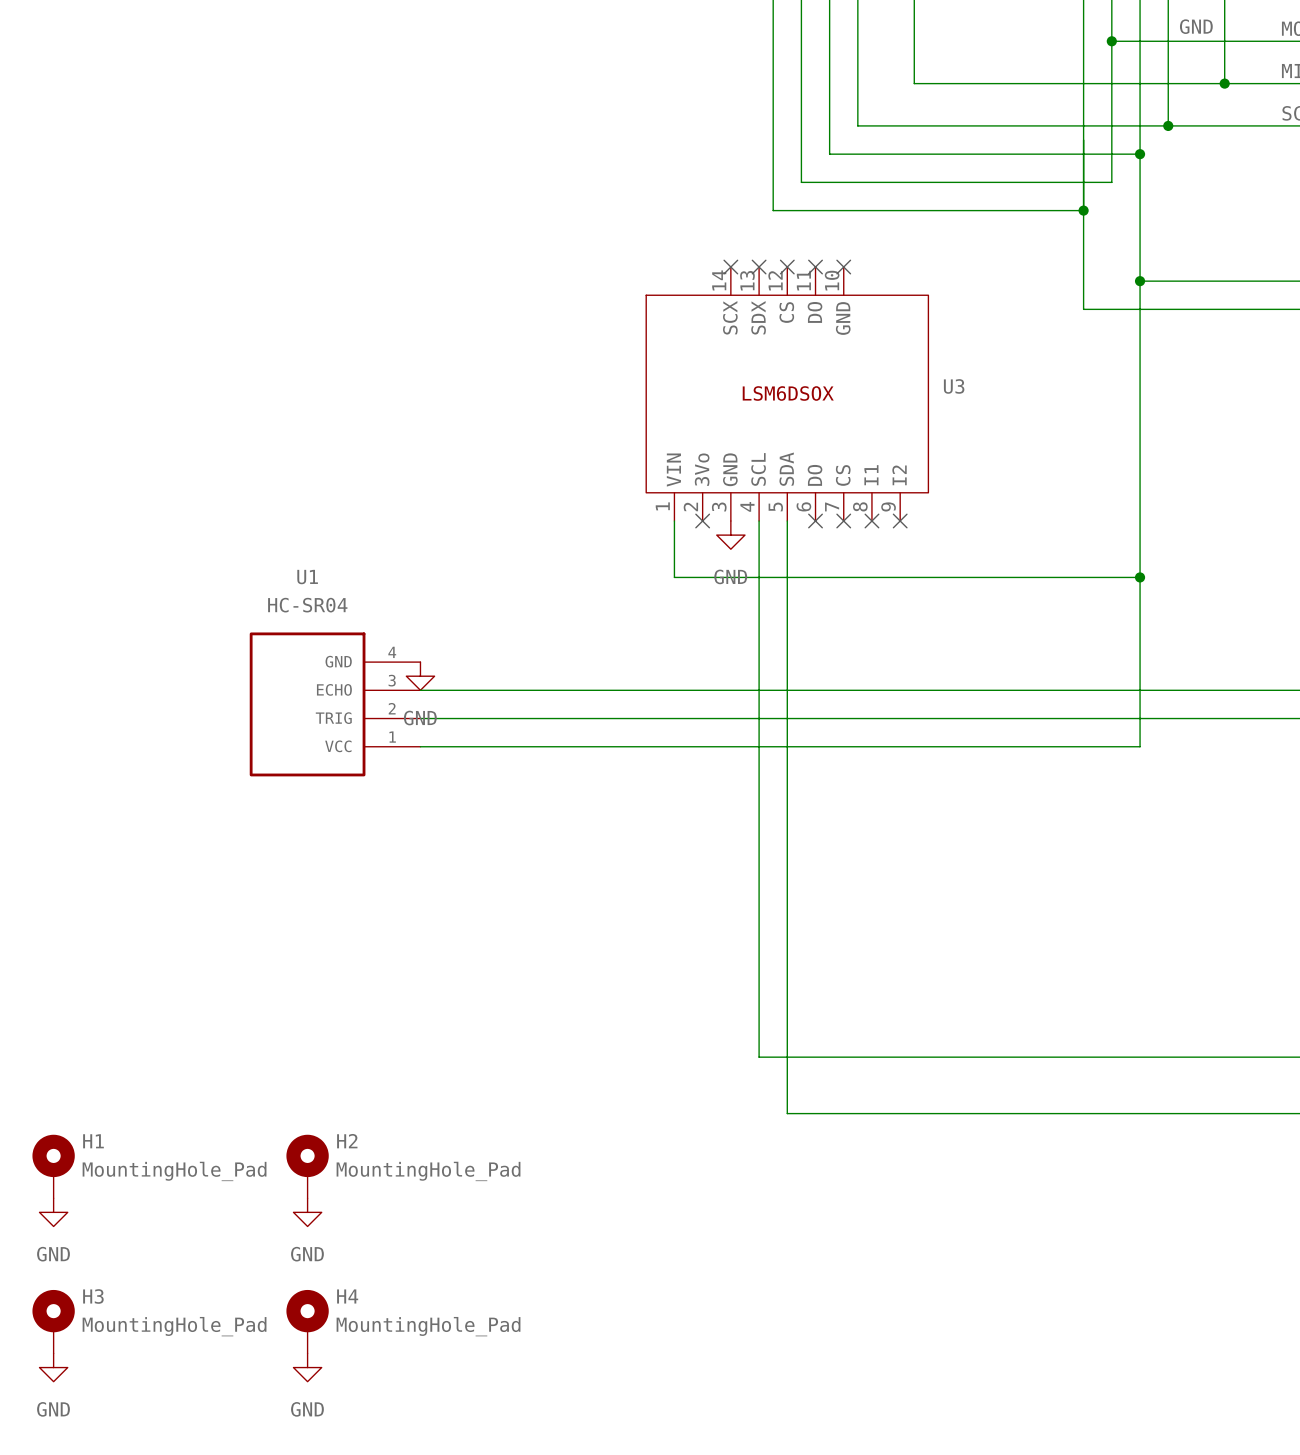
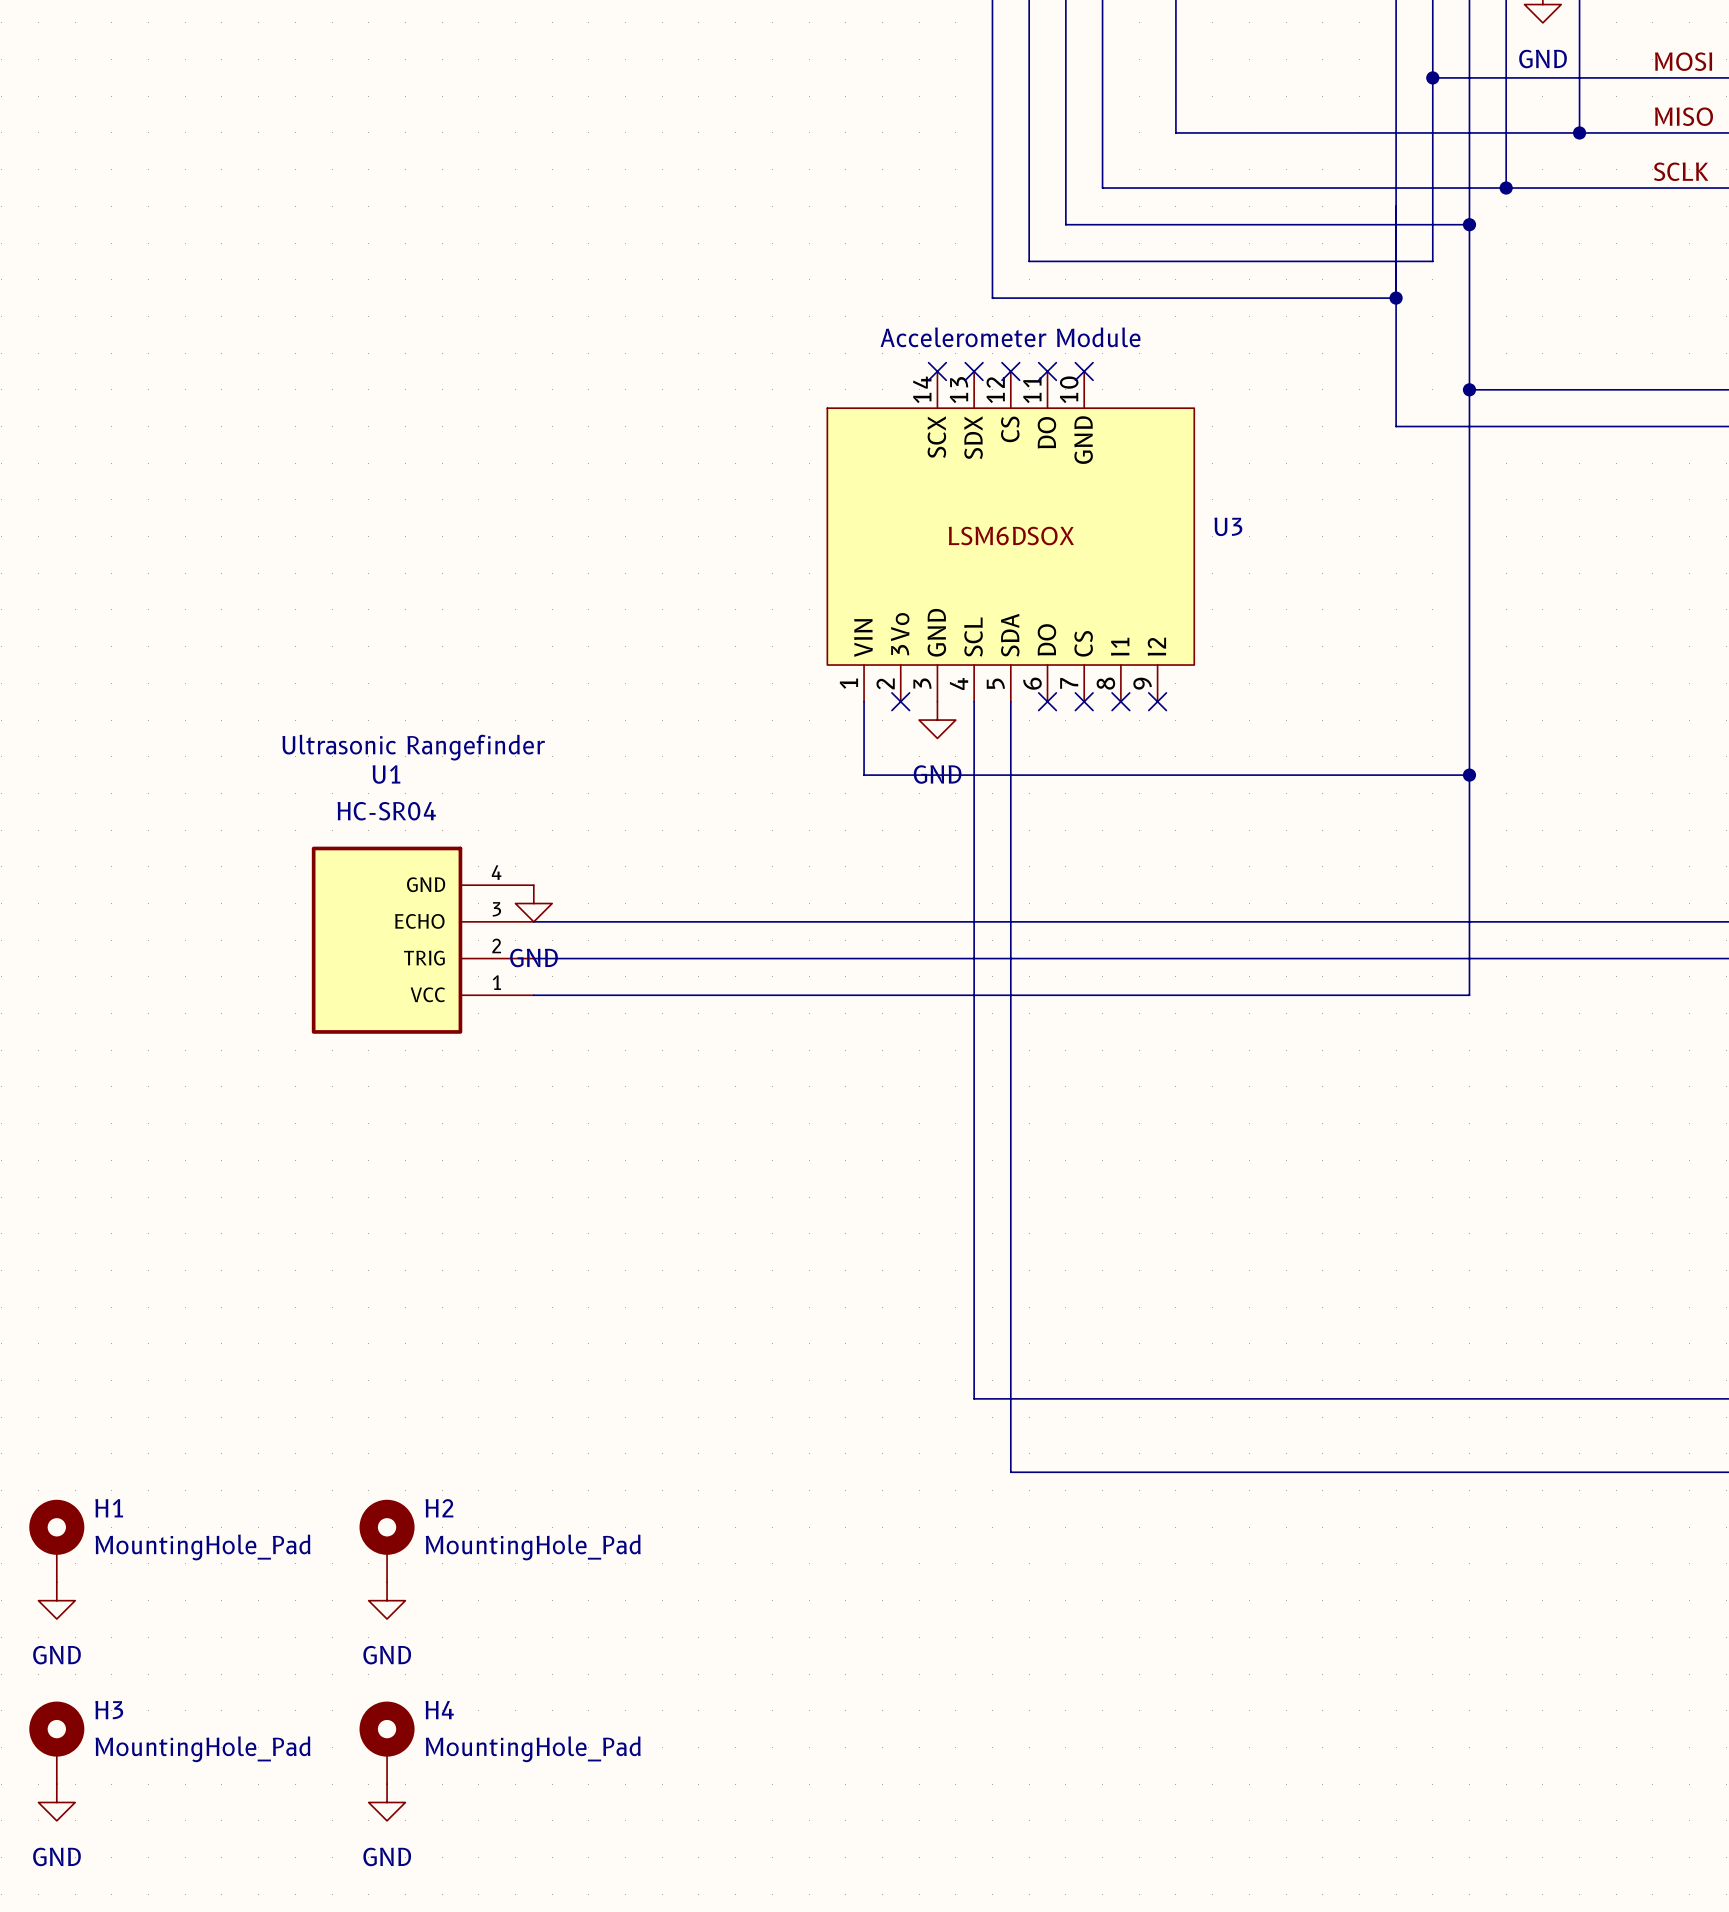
text: none -> Accelerometer Module (1010, 337)
text: none -> Ultrasonic Rangefinder (413, 747)

